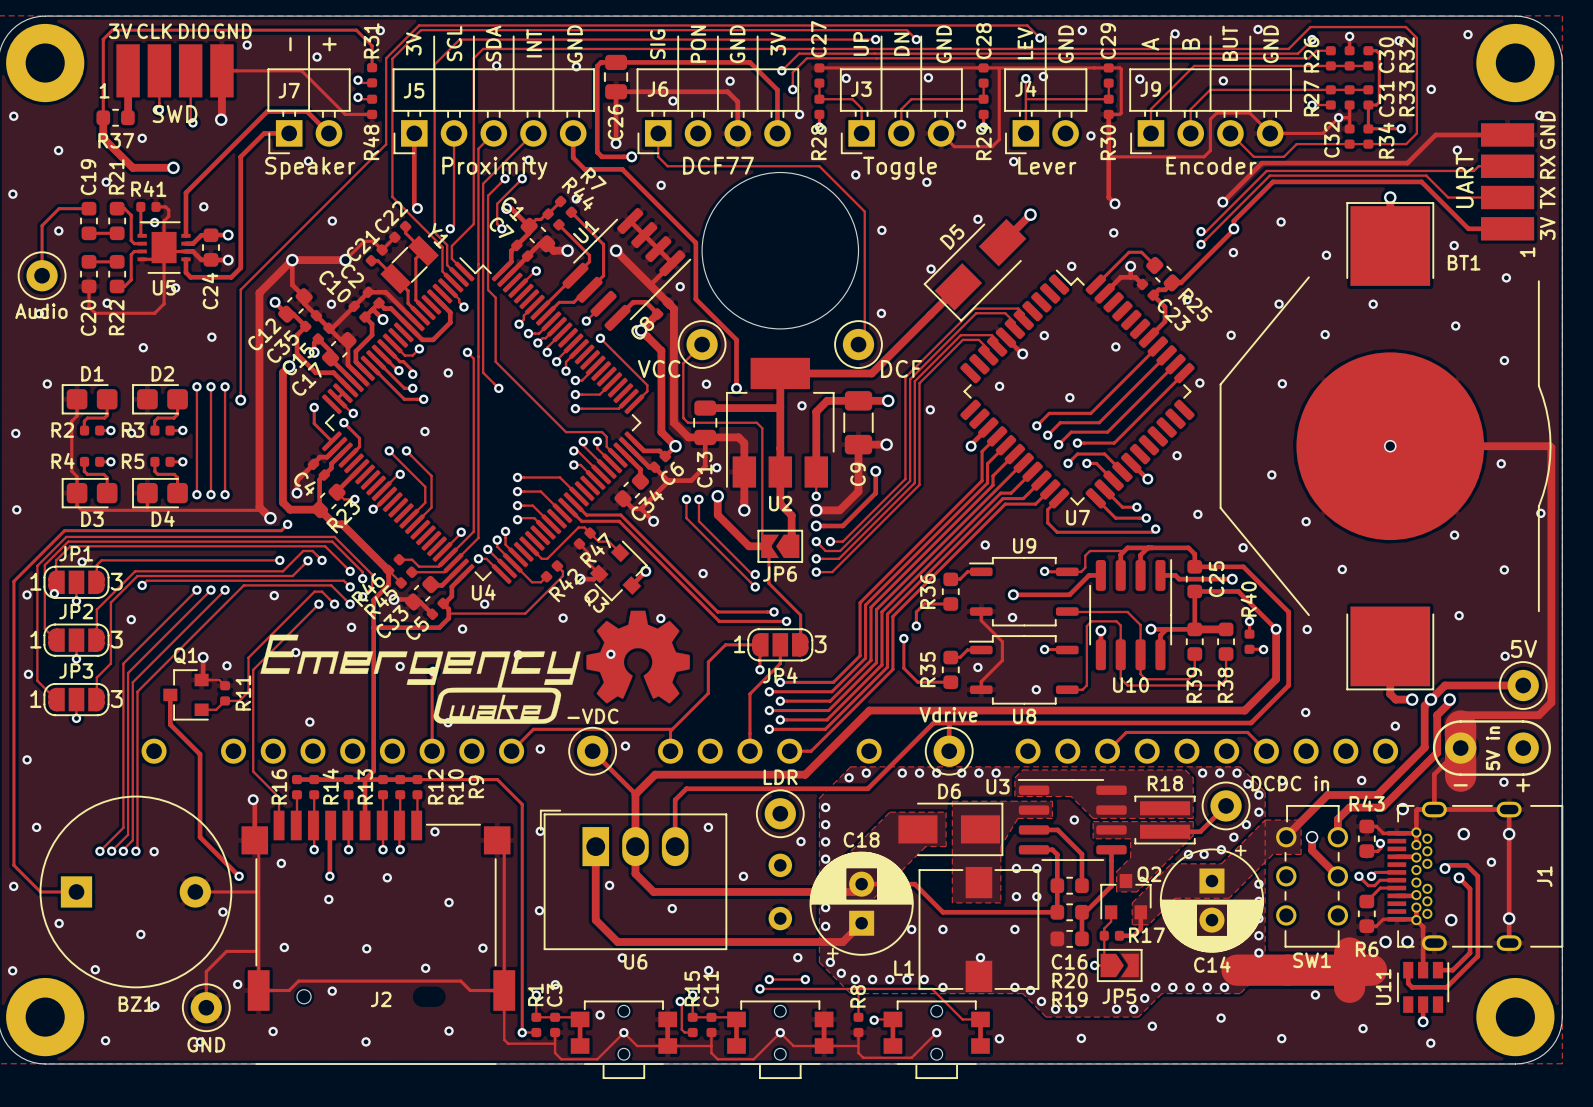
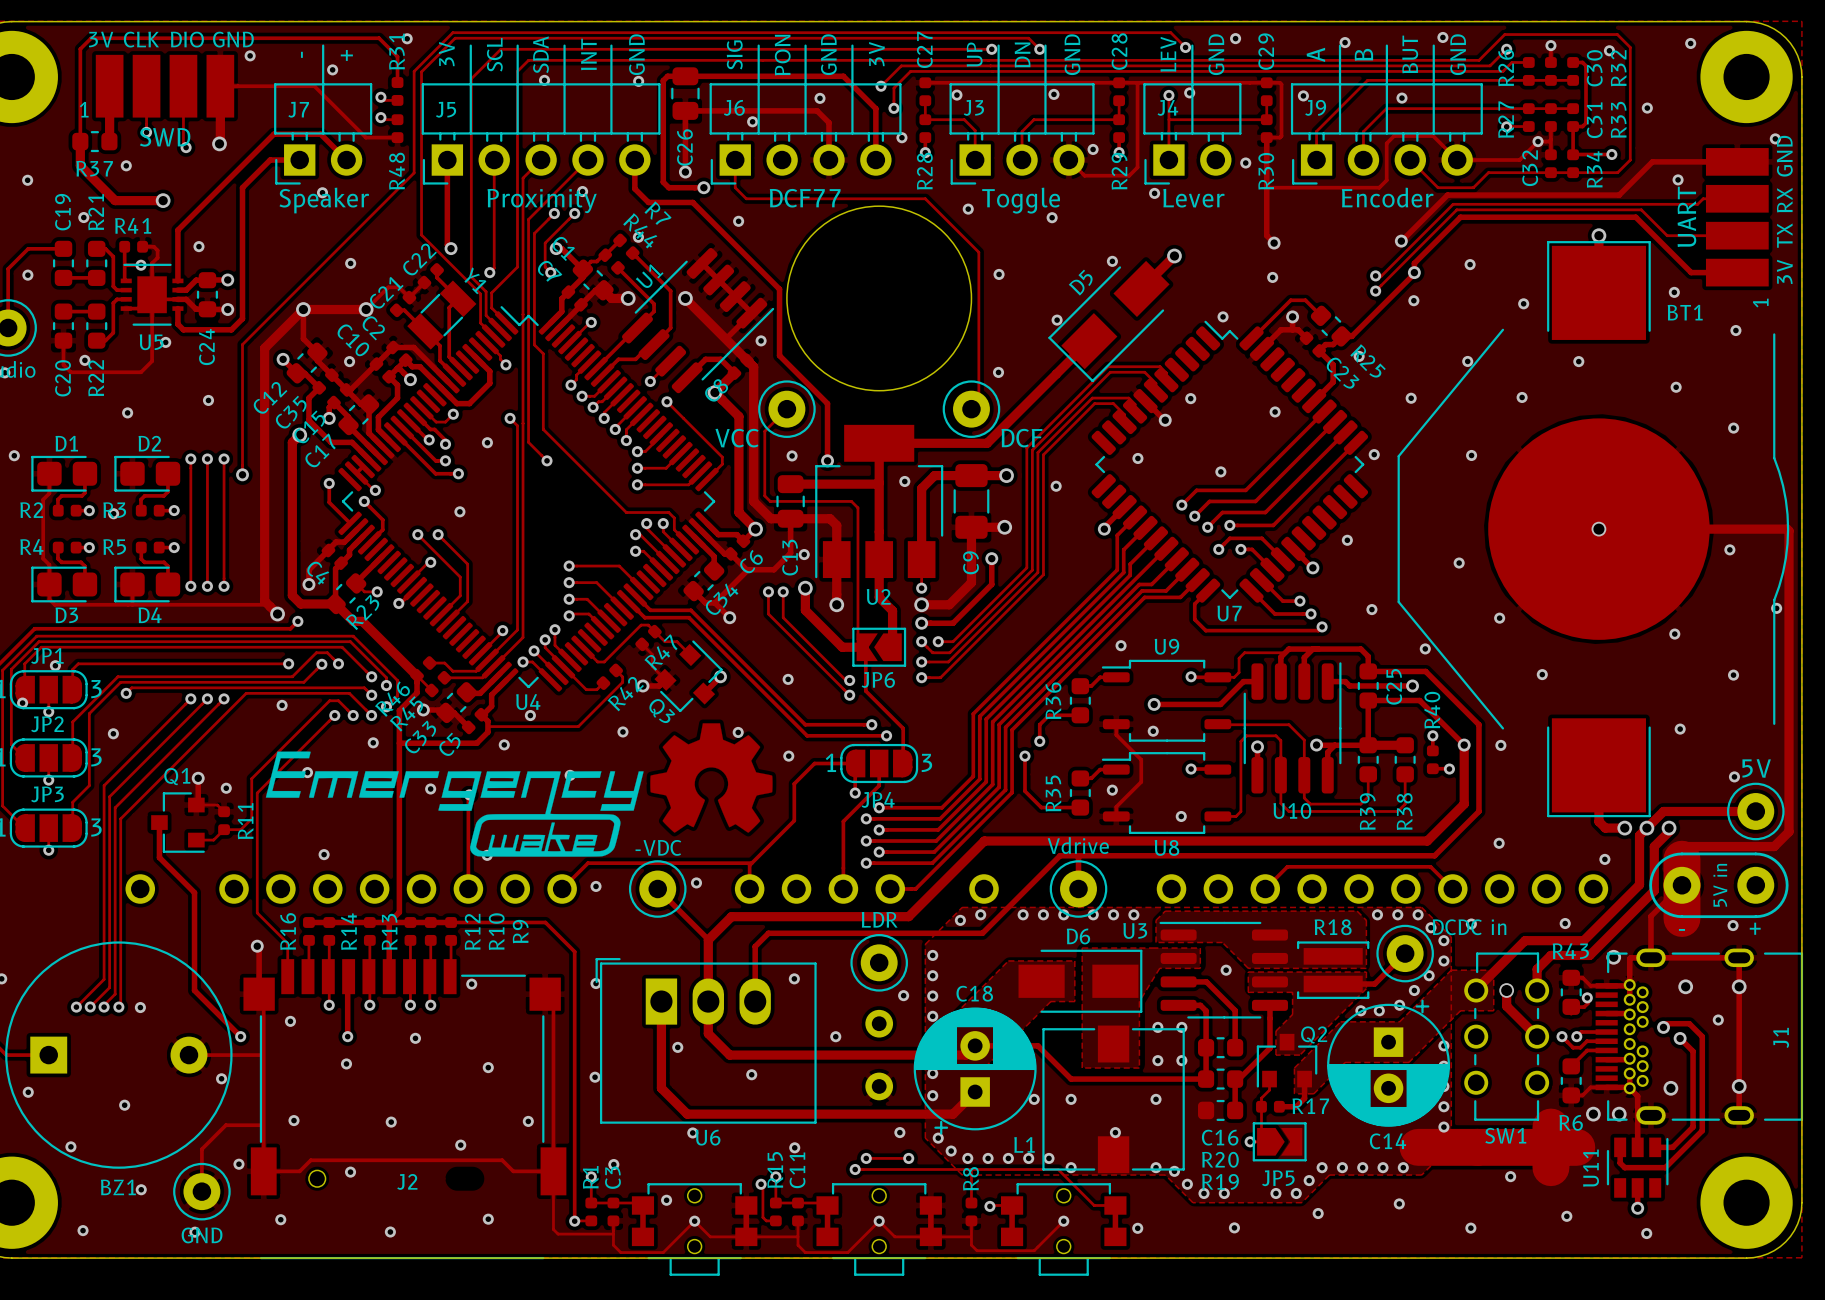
via: none -> (788, 756)
via: (610, 654) -> none

